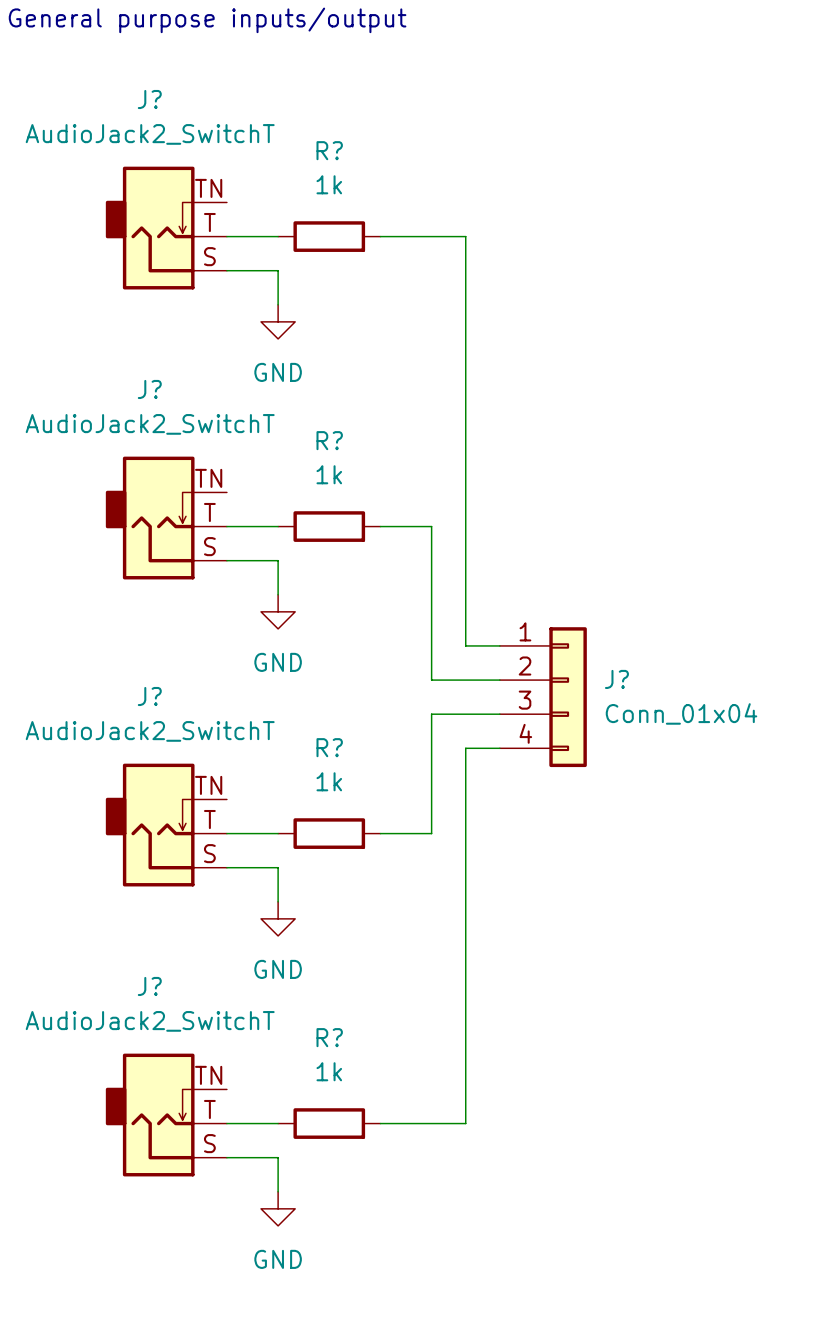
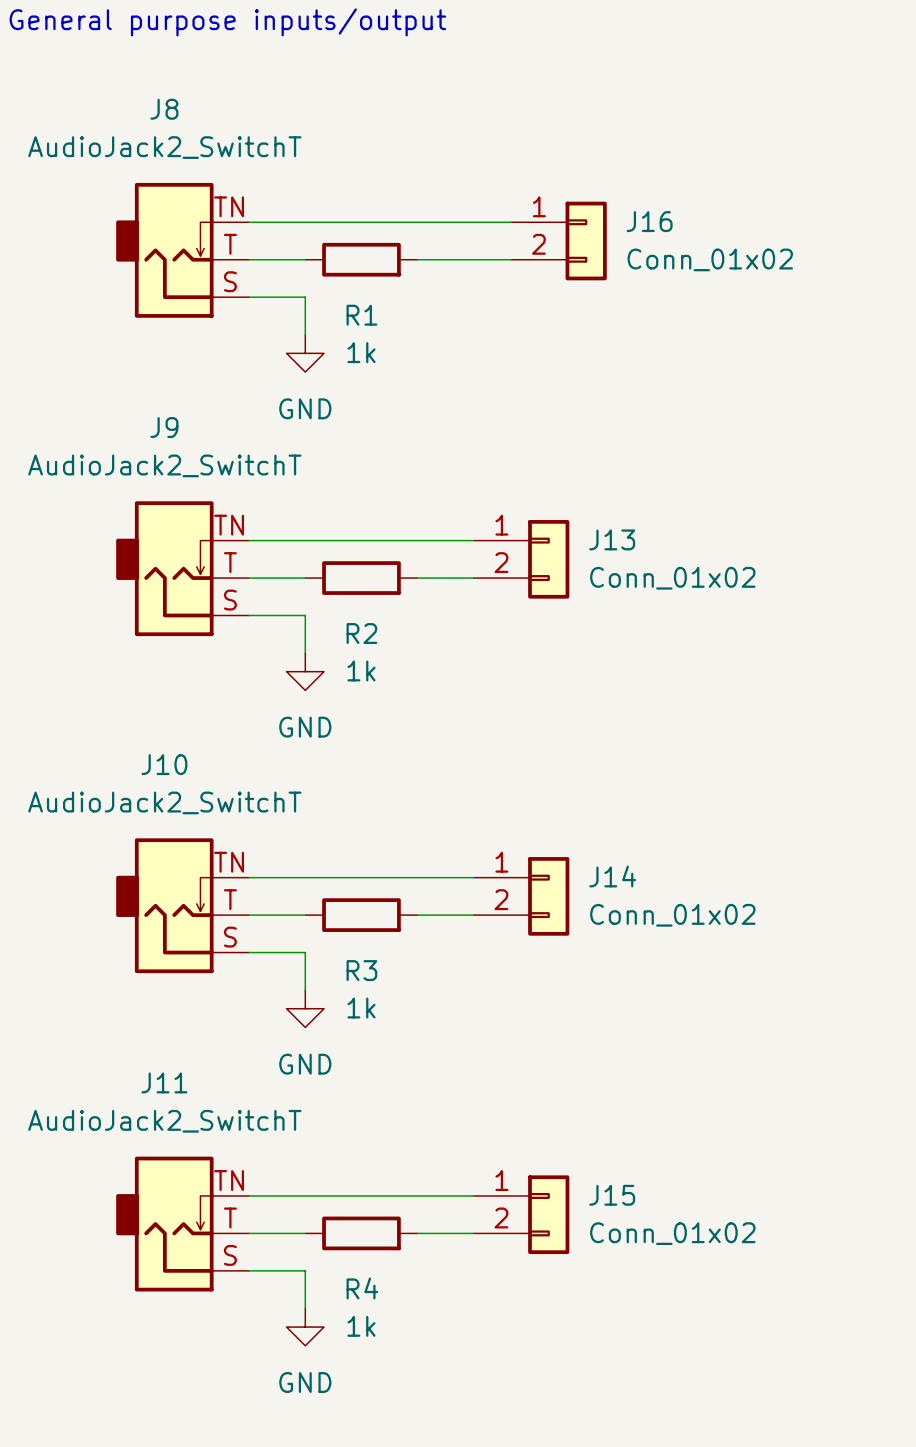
J? name: J? (149, 99) -> J8 (164, 109)
R? name: R? (329, 150) -> R1 (361, 315)
R? value position: 1k (329, 184) -> 1k (361, 352)
wire: none -> (249, 222) (511, 222)
J16: none -> Conn_01x02 (559, 241)
wire: (465, 236) (465, 645) (499, 645) -> none
J? name: J? (149, 389) -> J9 (164, 427)
R? name: R? (329, 440) -> R2 (361, 633)
R? value position: 1k (329, 474) -> 1k (361, 670)
wire: none -> (249, 540) (473, 540)
J13: none -> Conn_01x02 (521, 559)
wire: (431, 526) (431, 680) (499, 680) -> none
J? name: J? (149, 696) -> J10 (164, 764)
J?: Conn_01x04 (543, 697) -> none
wire: (499, 714) (431, 714) (431, 833) -> none
R? name: R? (329, 747) -> R3 (361, 970)
wire: (499, 748) (465, 748) (465, 1123) (431, 1123) -> none
R? value position: 1k (329, 781) -> 1k (361, 1008)
wire: none -> (249, 877) (473, 877)
J14: none -> Conn_01x02 (521, 896)
J? name: J? (149, 986) -> J11 (164, 1082)
R? name: R? (329, 1037) -> R4 (362, 1288)
R? value position: 1k (329, 1071) -> 1k (361, 1326)
wire: none -> (249, 1195) (473, 1195)
J15: none -> Conn_01x02 (521, 1214)

